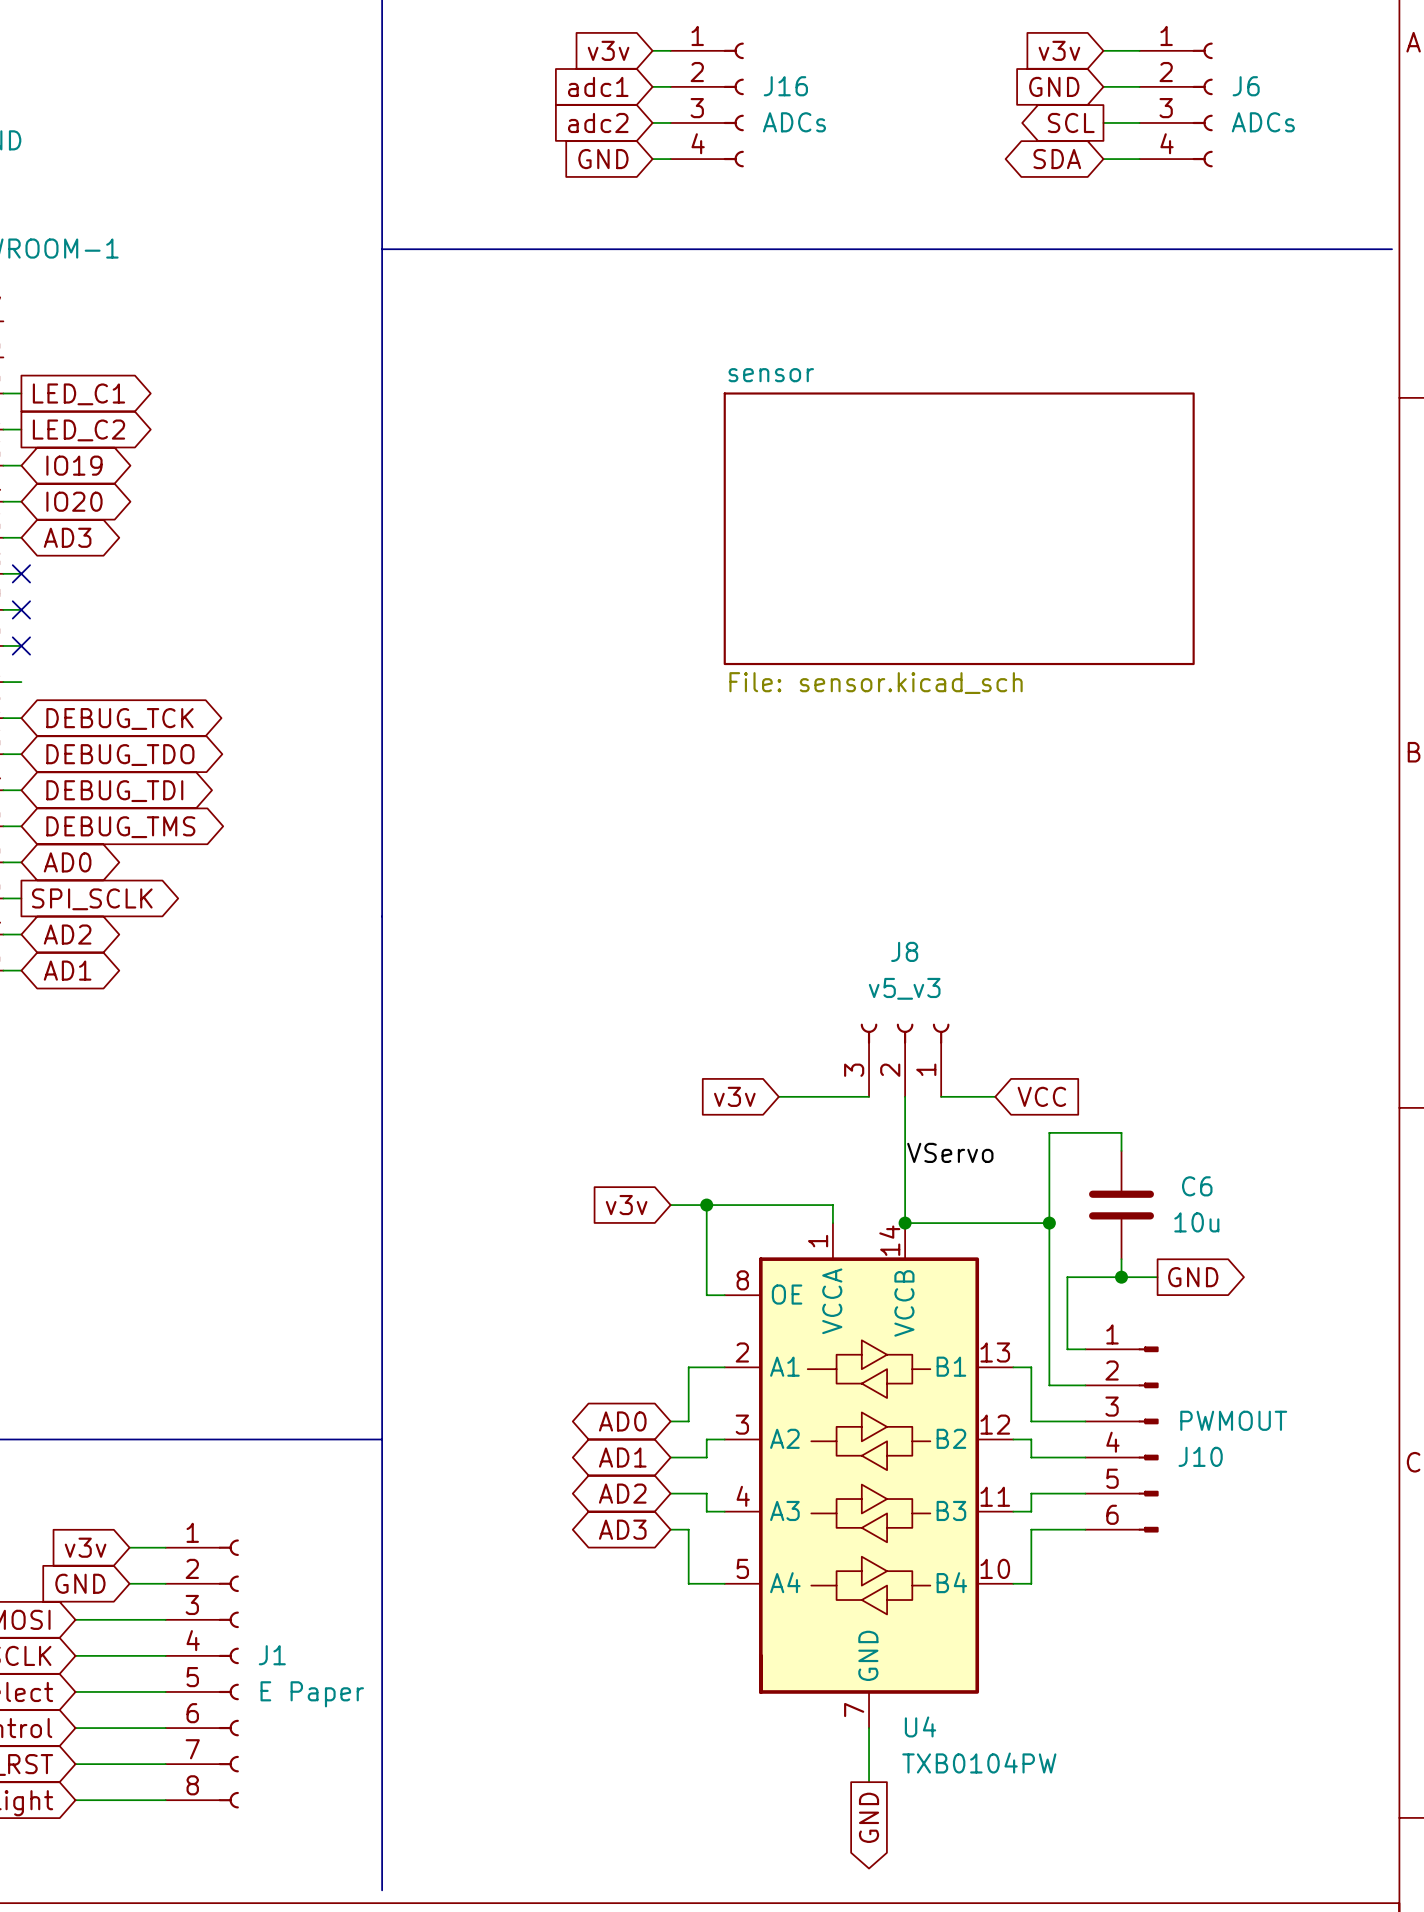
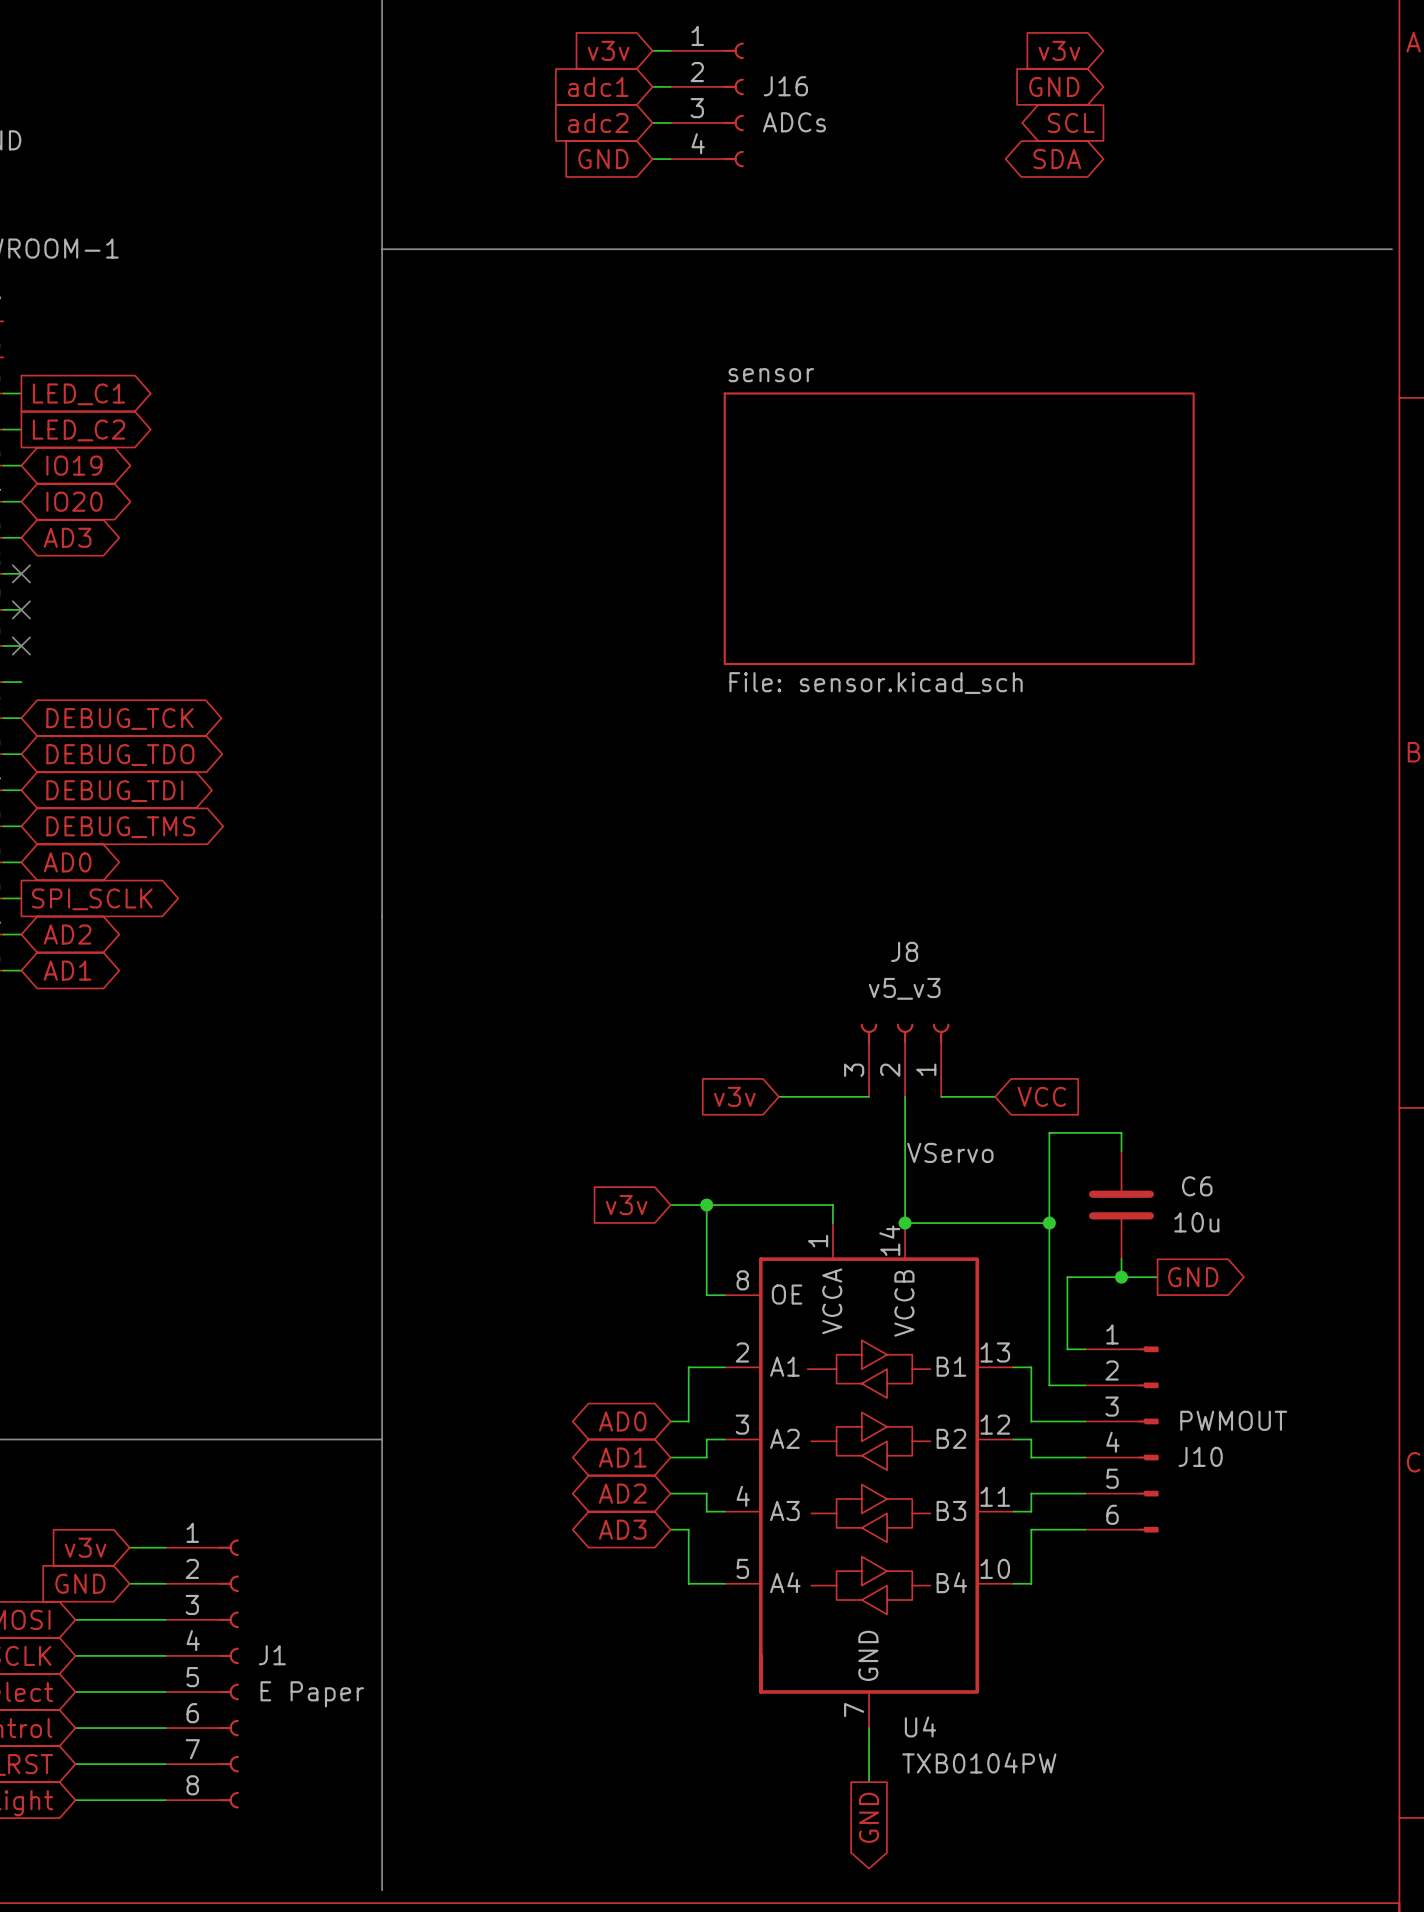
wire: (1103, 50) (1139, 50) -> none
wire: (1103, 86) (1139, 86) -> none
J6: ADCs (1176, 104) -> none
wire: (1103, 122) (1139, 122) -> none
wire: (1103, 159) (1139, 159) -> none

